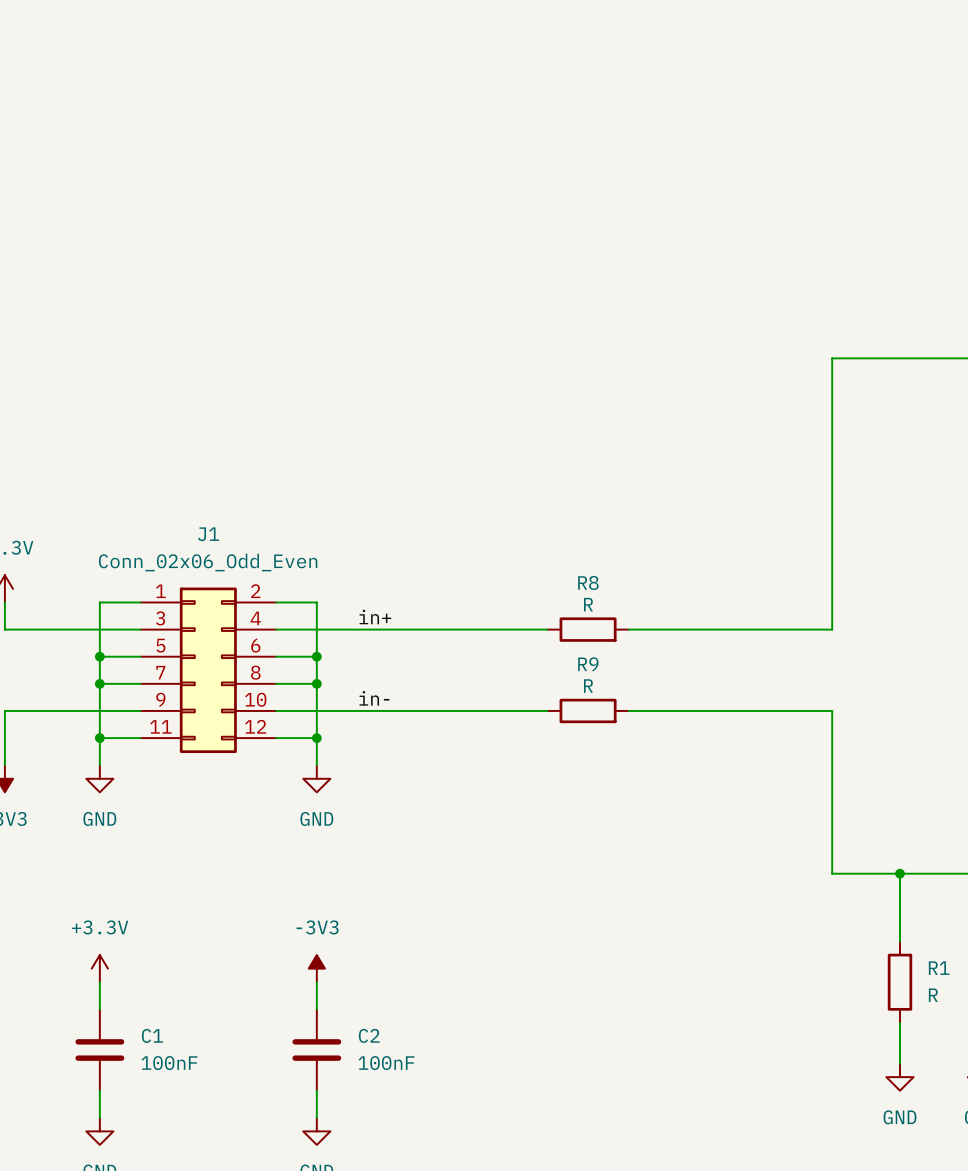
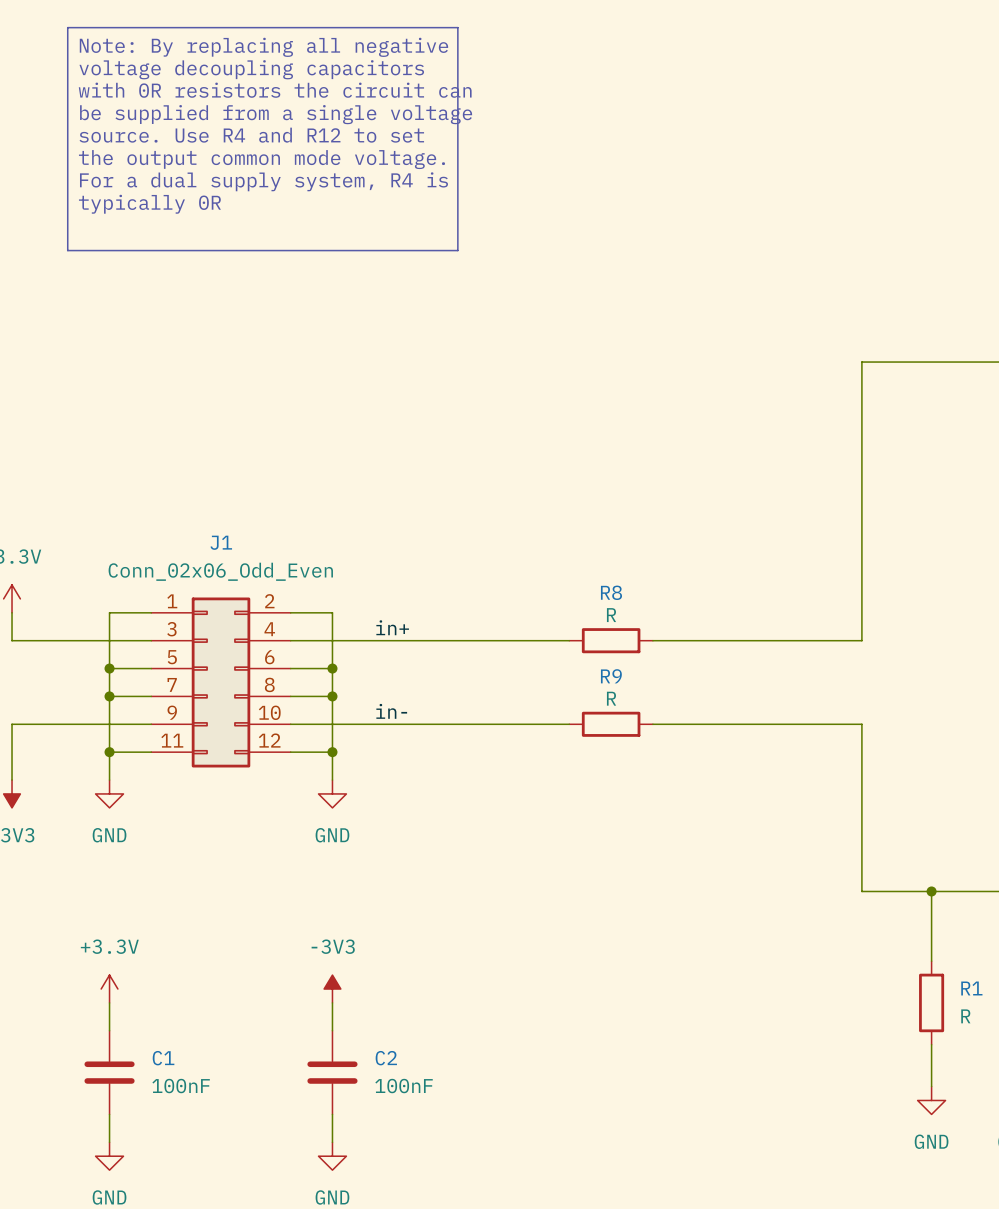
line: none -> (67, 27) (457, 27) (457, 250) (67, 250) (67, 27)
text: none -> Note: By replacing all negative (263, 47)
text: none -> voltage decoupling capacitors (251, 69)
text: none -> with 0R resistors the circuit can (275, 90)
text: none -> be supplied from a single voltage (276, 114)
text: none -> source. Use R4 and R12 to set (251, 135)
text: none -> the output common mode voltage. (261, 159)
text: none -> For a dual supply system, R4 is (263, 181)
text: none -> typically 0R (149, 204)

